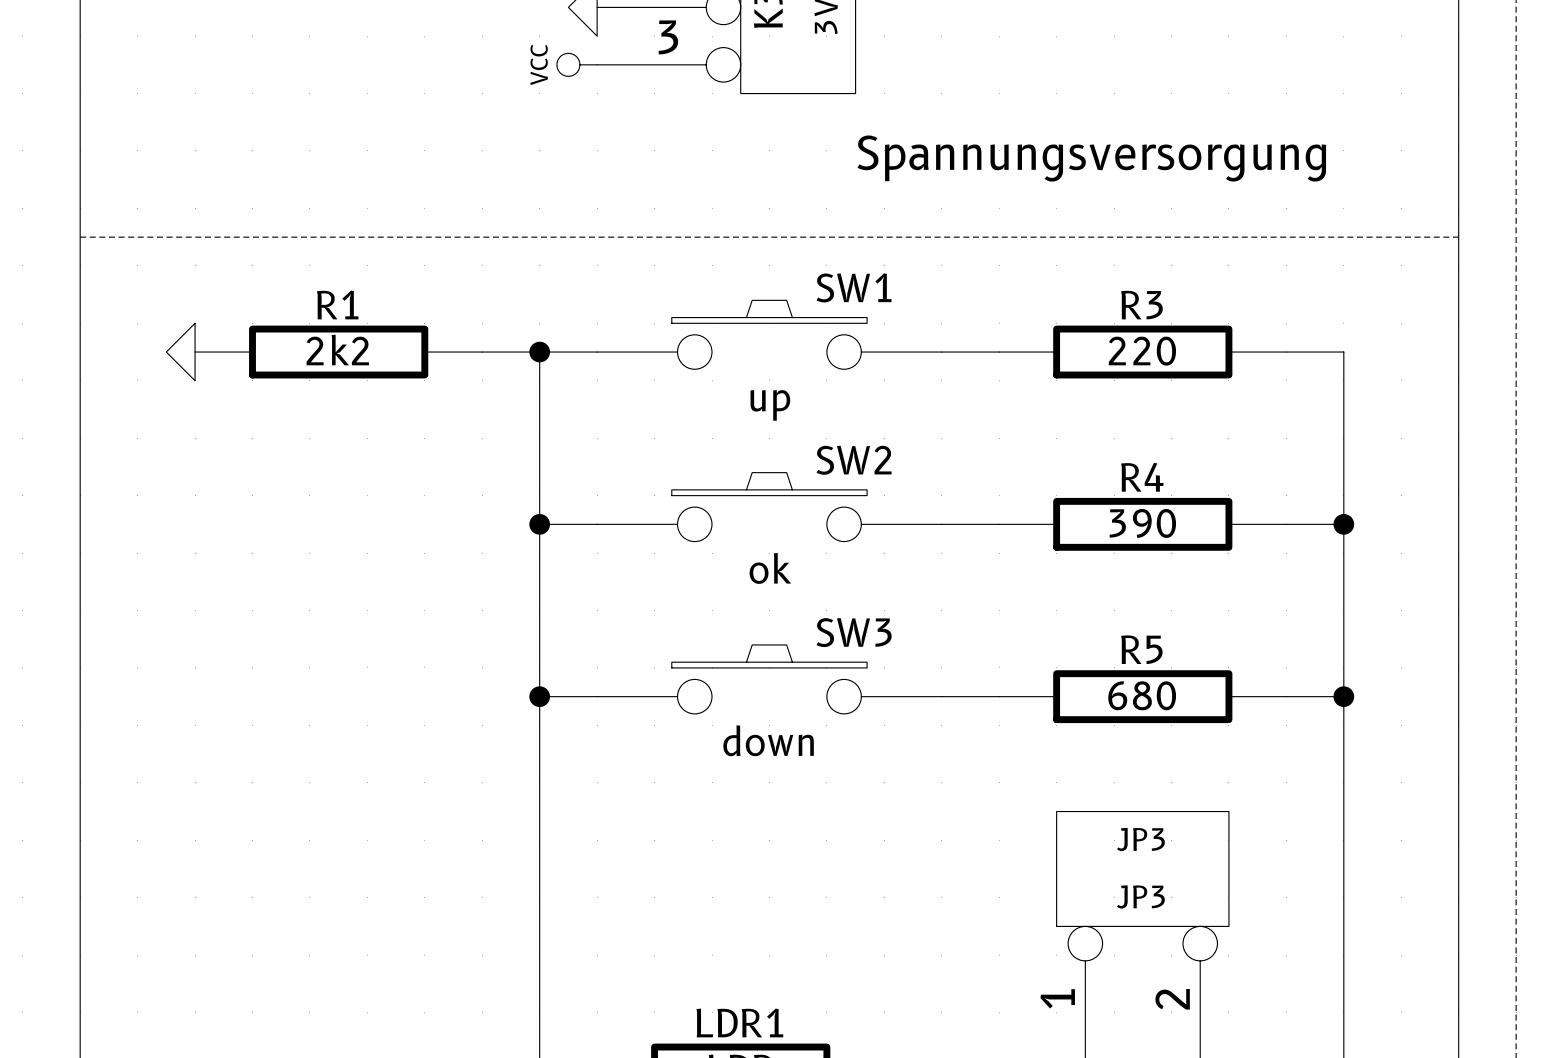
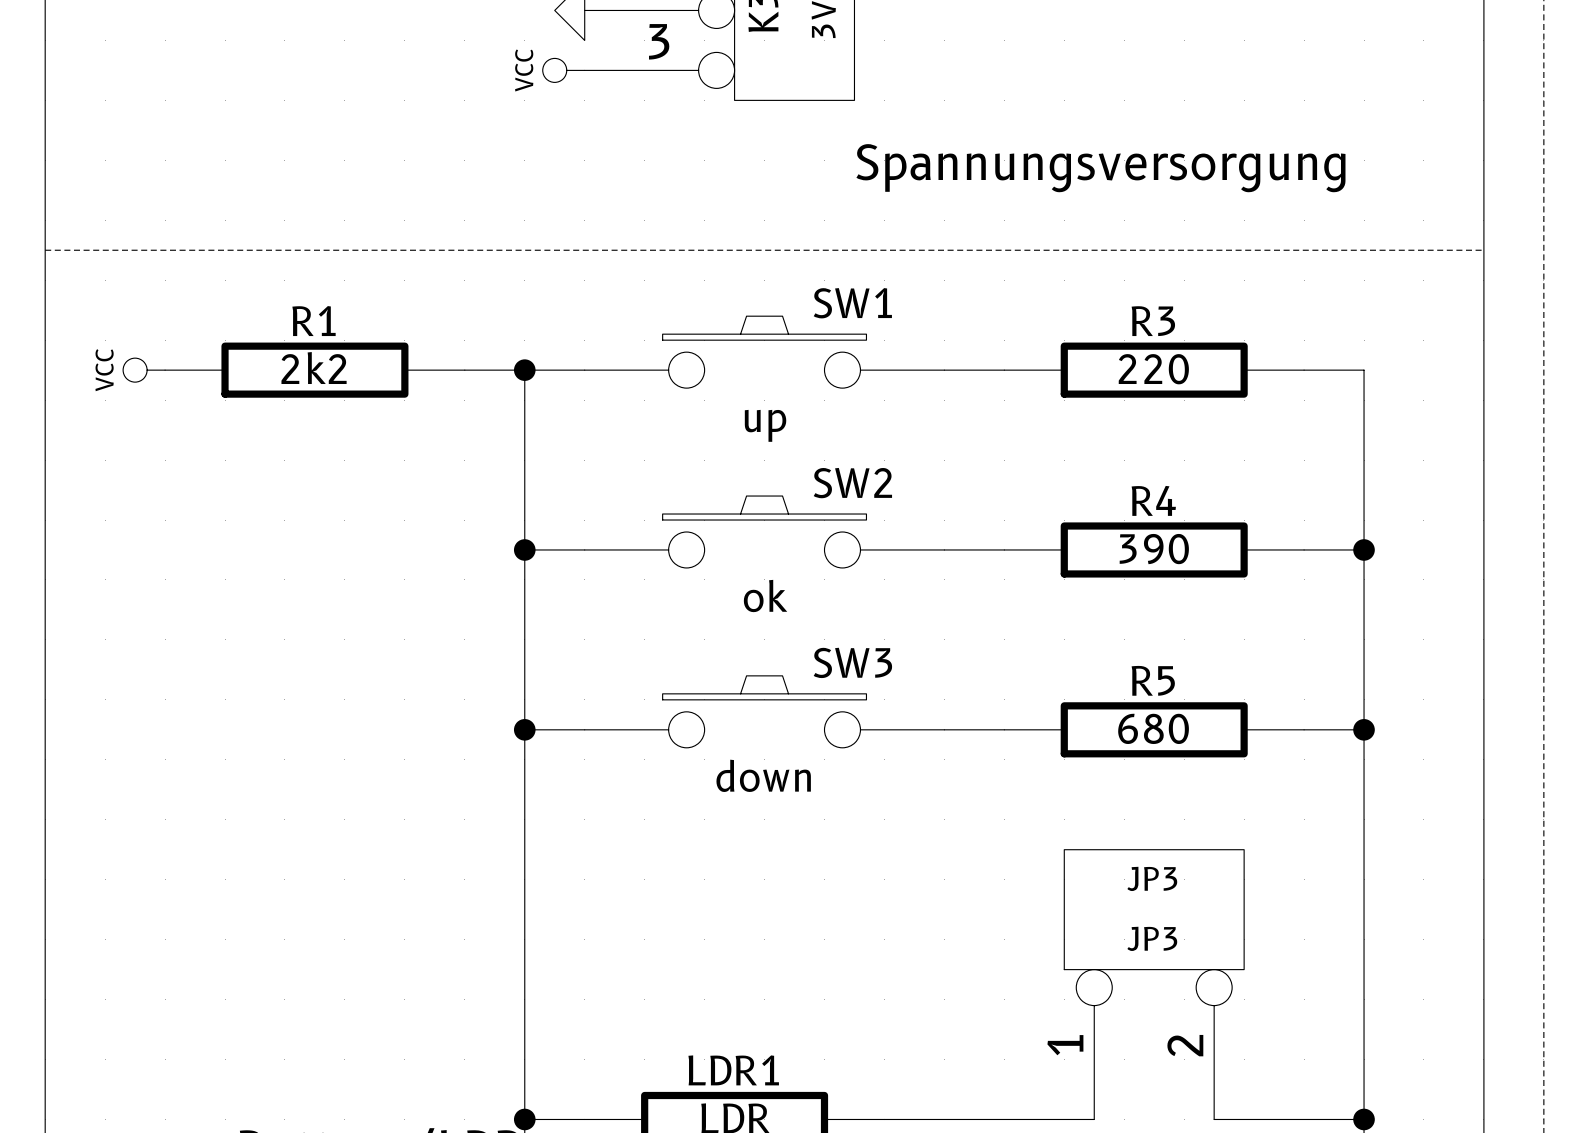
power symbol shape: [166, 323, 196, 381] -> [123, 358, 166, 383]
power symbol text: none -> VCC (104, 370)

